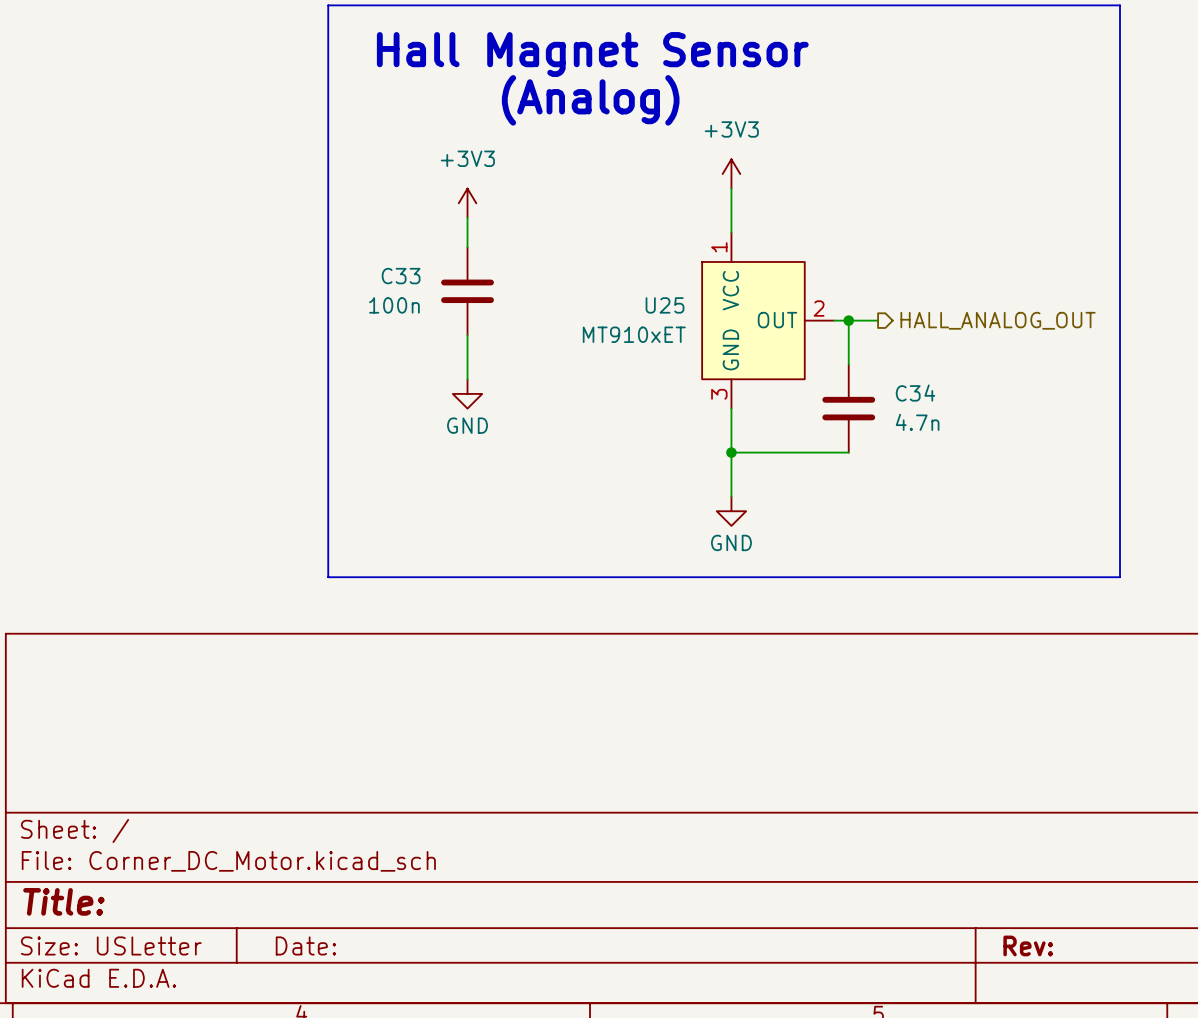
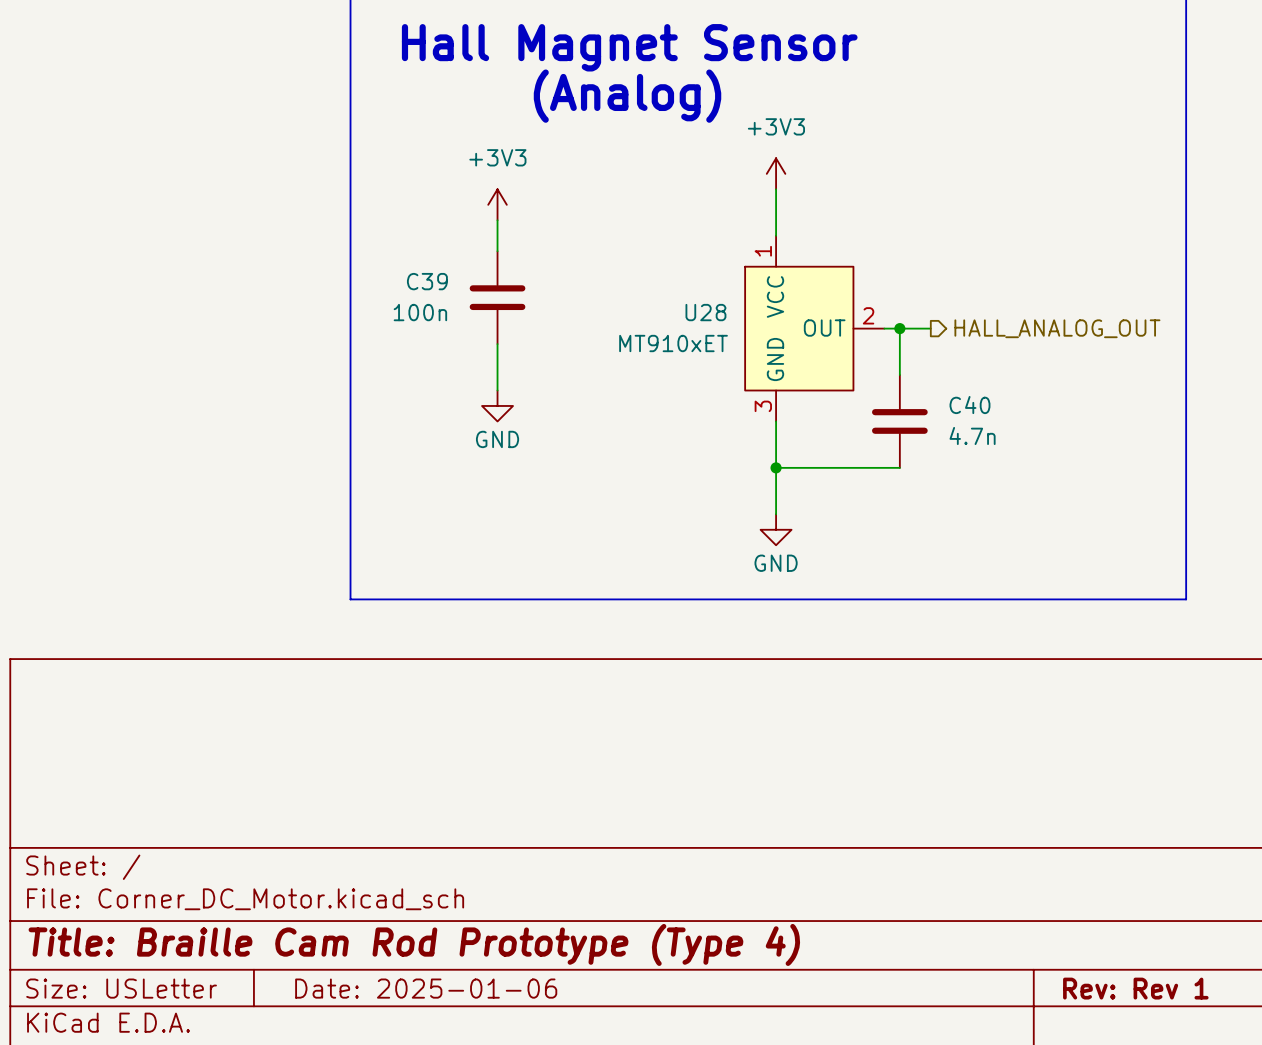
C33 name: C33 (401, 276) -> C39 (427, 281)
U25 name: U25 (665, 305) -> U28 (705, 312)
C34 name: C34 (915, 393) -> C40 (969, 405)
title block: Title: (63, 901) -> Title: Braille Cam Rod Prototype (Type 4) (414, 944)
title block: Date: (305, 945) -> Date: 2025-01-06 (426, 988)
title block: Rev: (1028, 945) -> Rev: Rev 1 (1135, 988)

